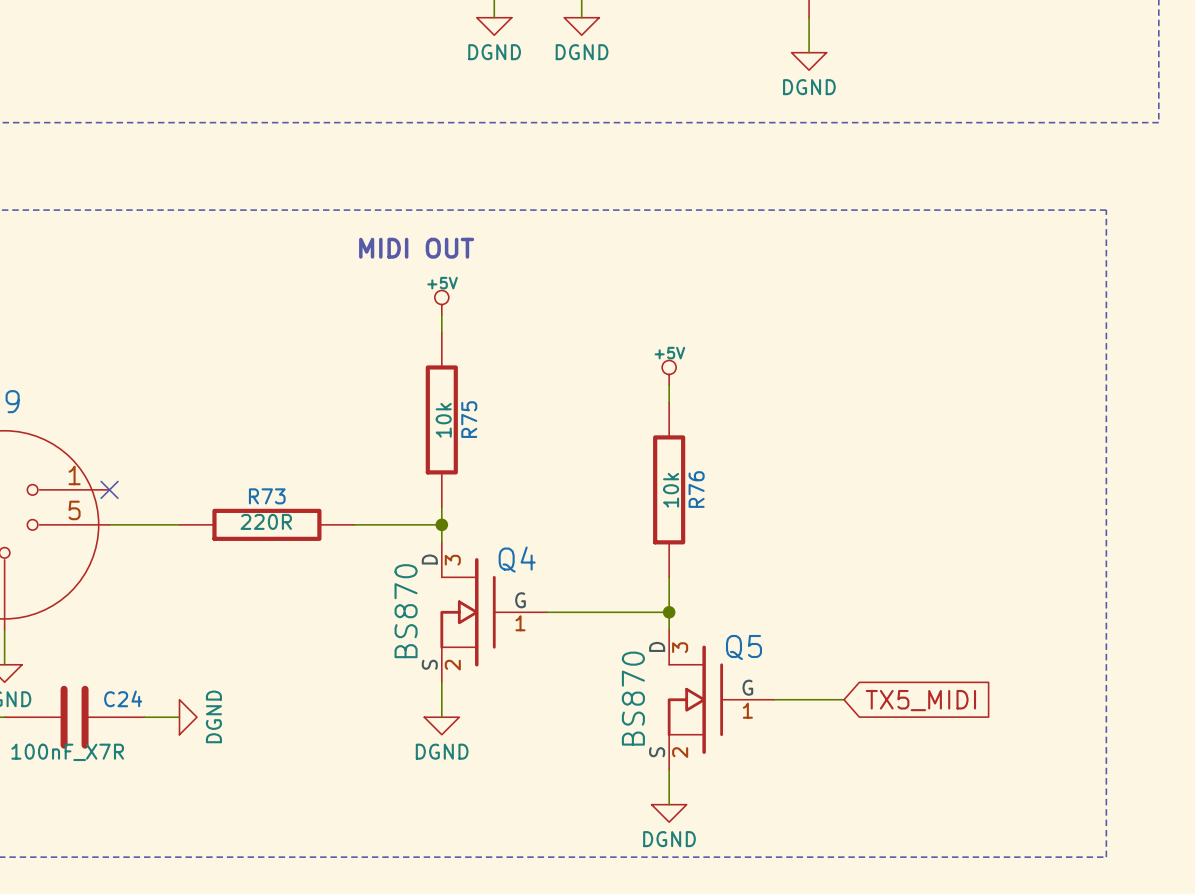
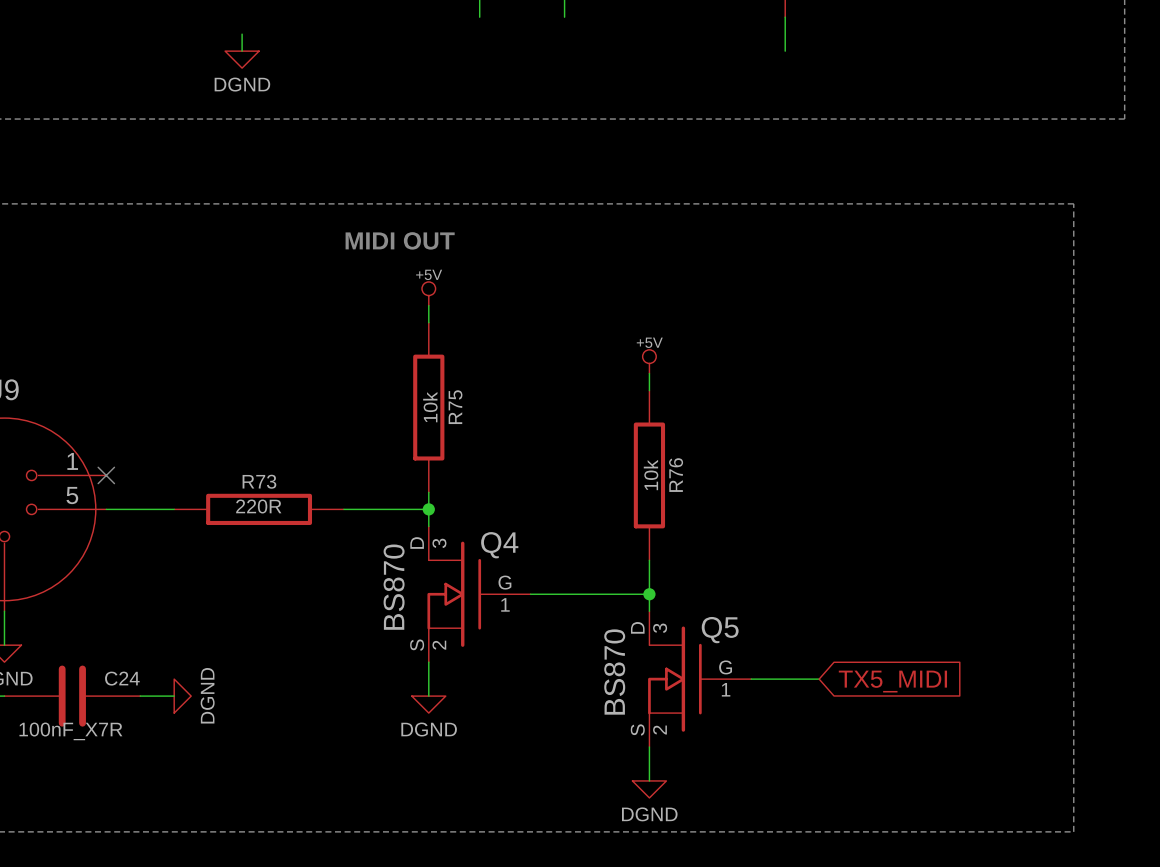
power symbol: DGND (494, 26) -> none
power symbol: DGND (581, 26) -> none
wire: none -> (242, 34) (242, 51)
power symbol: none -> DGND (242, 59)
power symbol: DGND (809, 61) -> none

